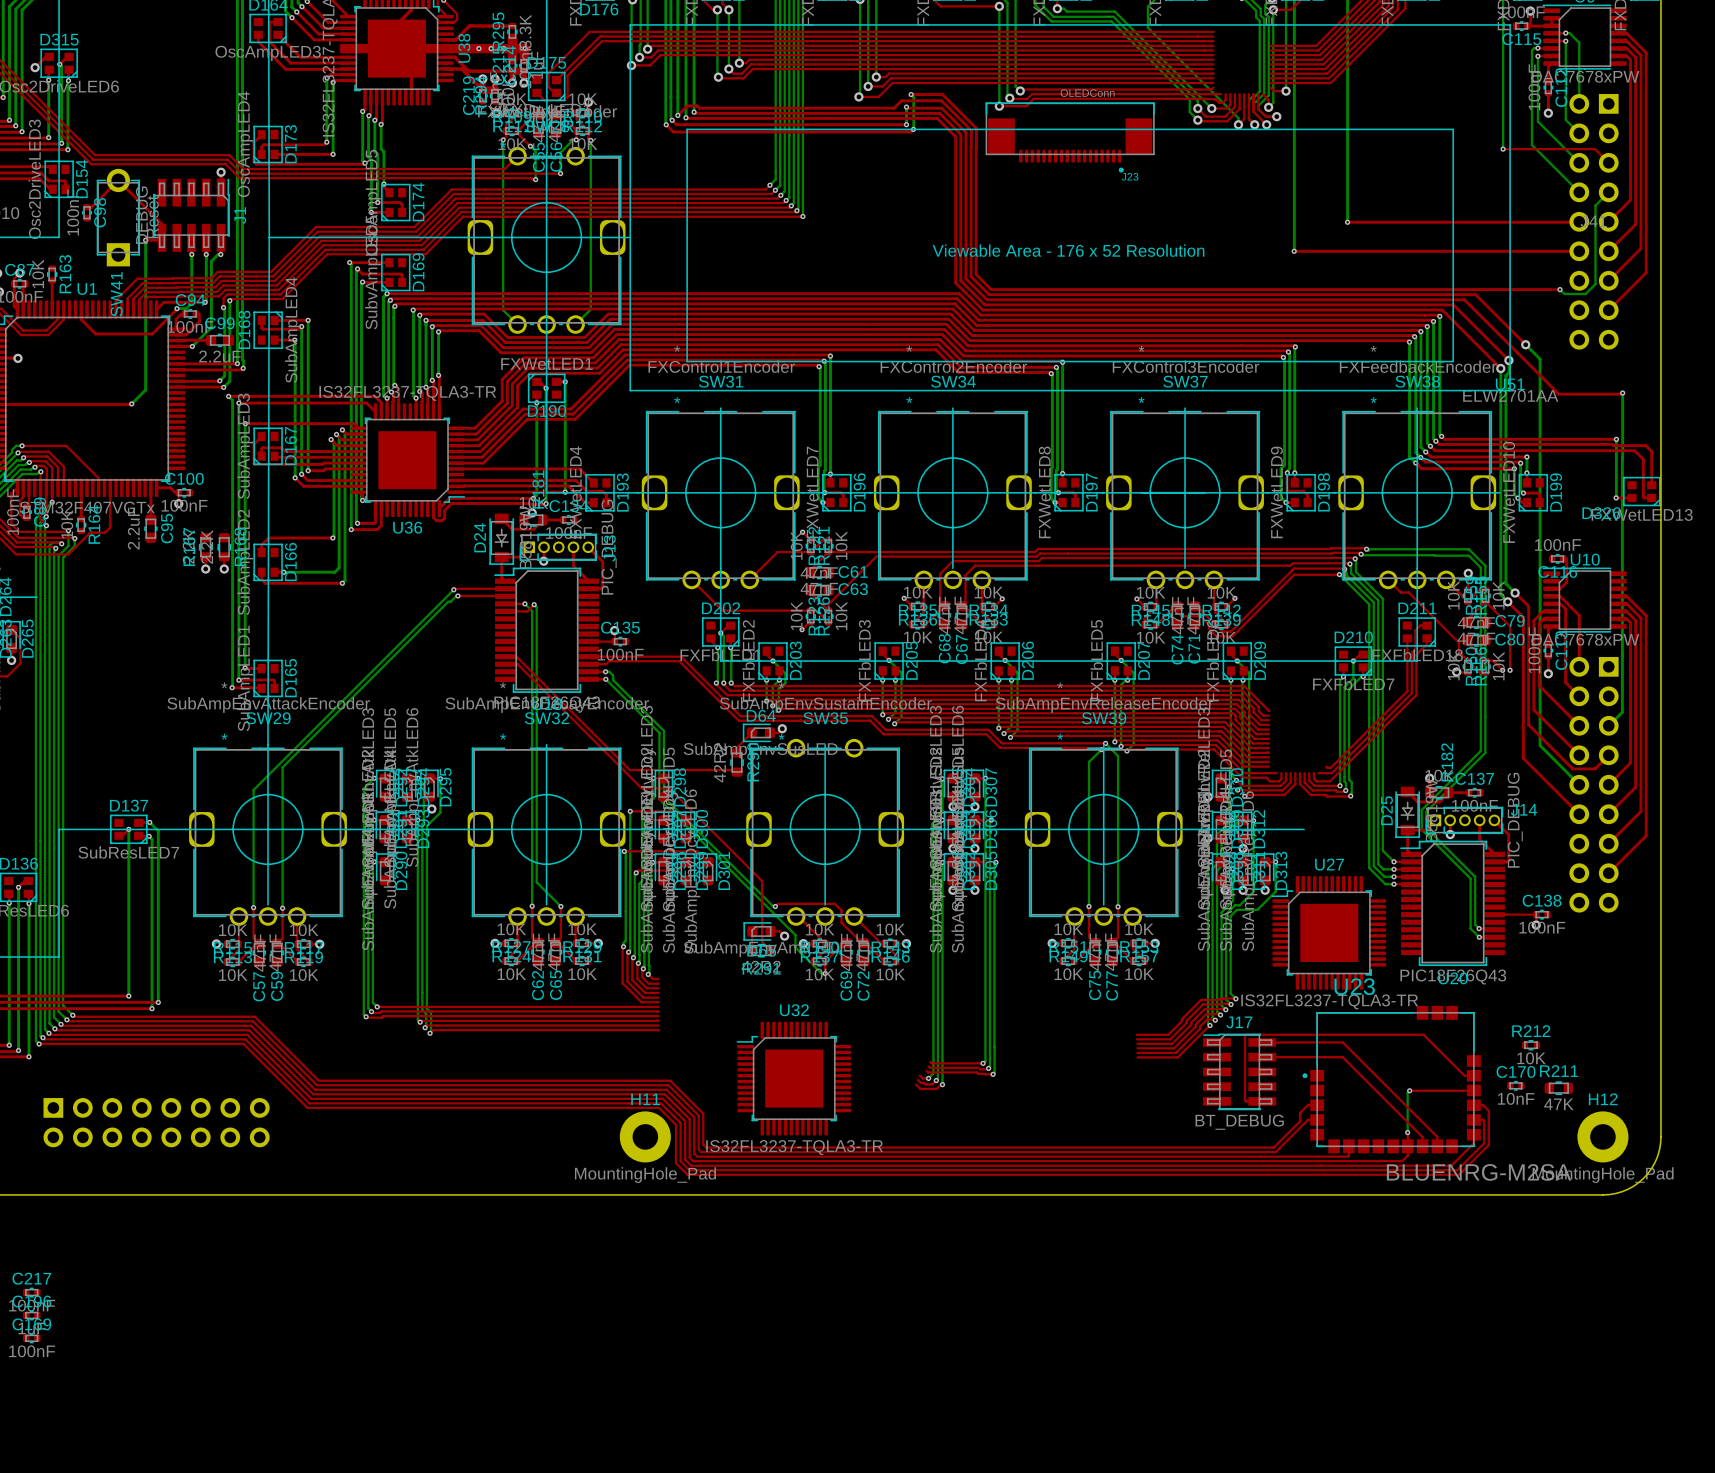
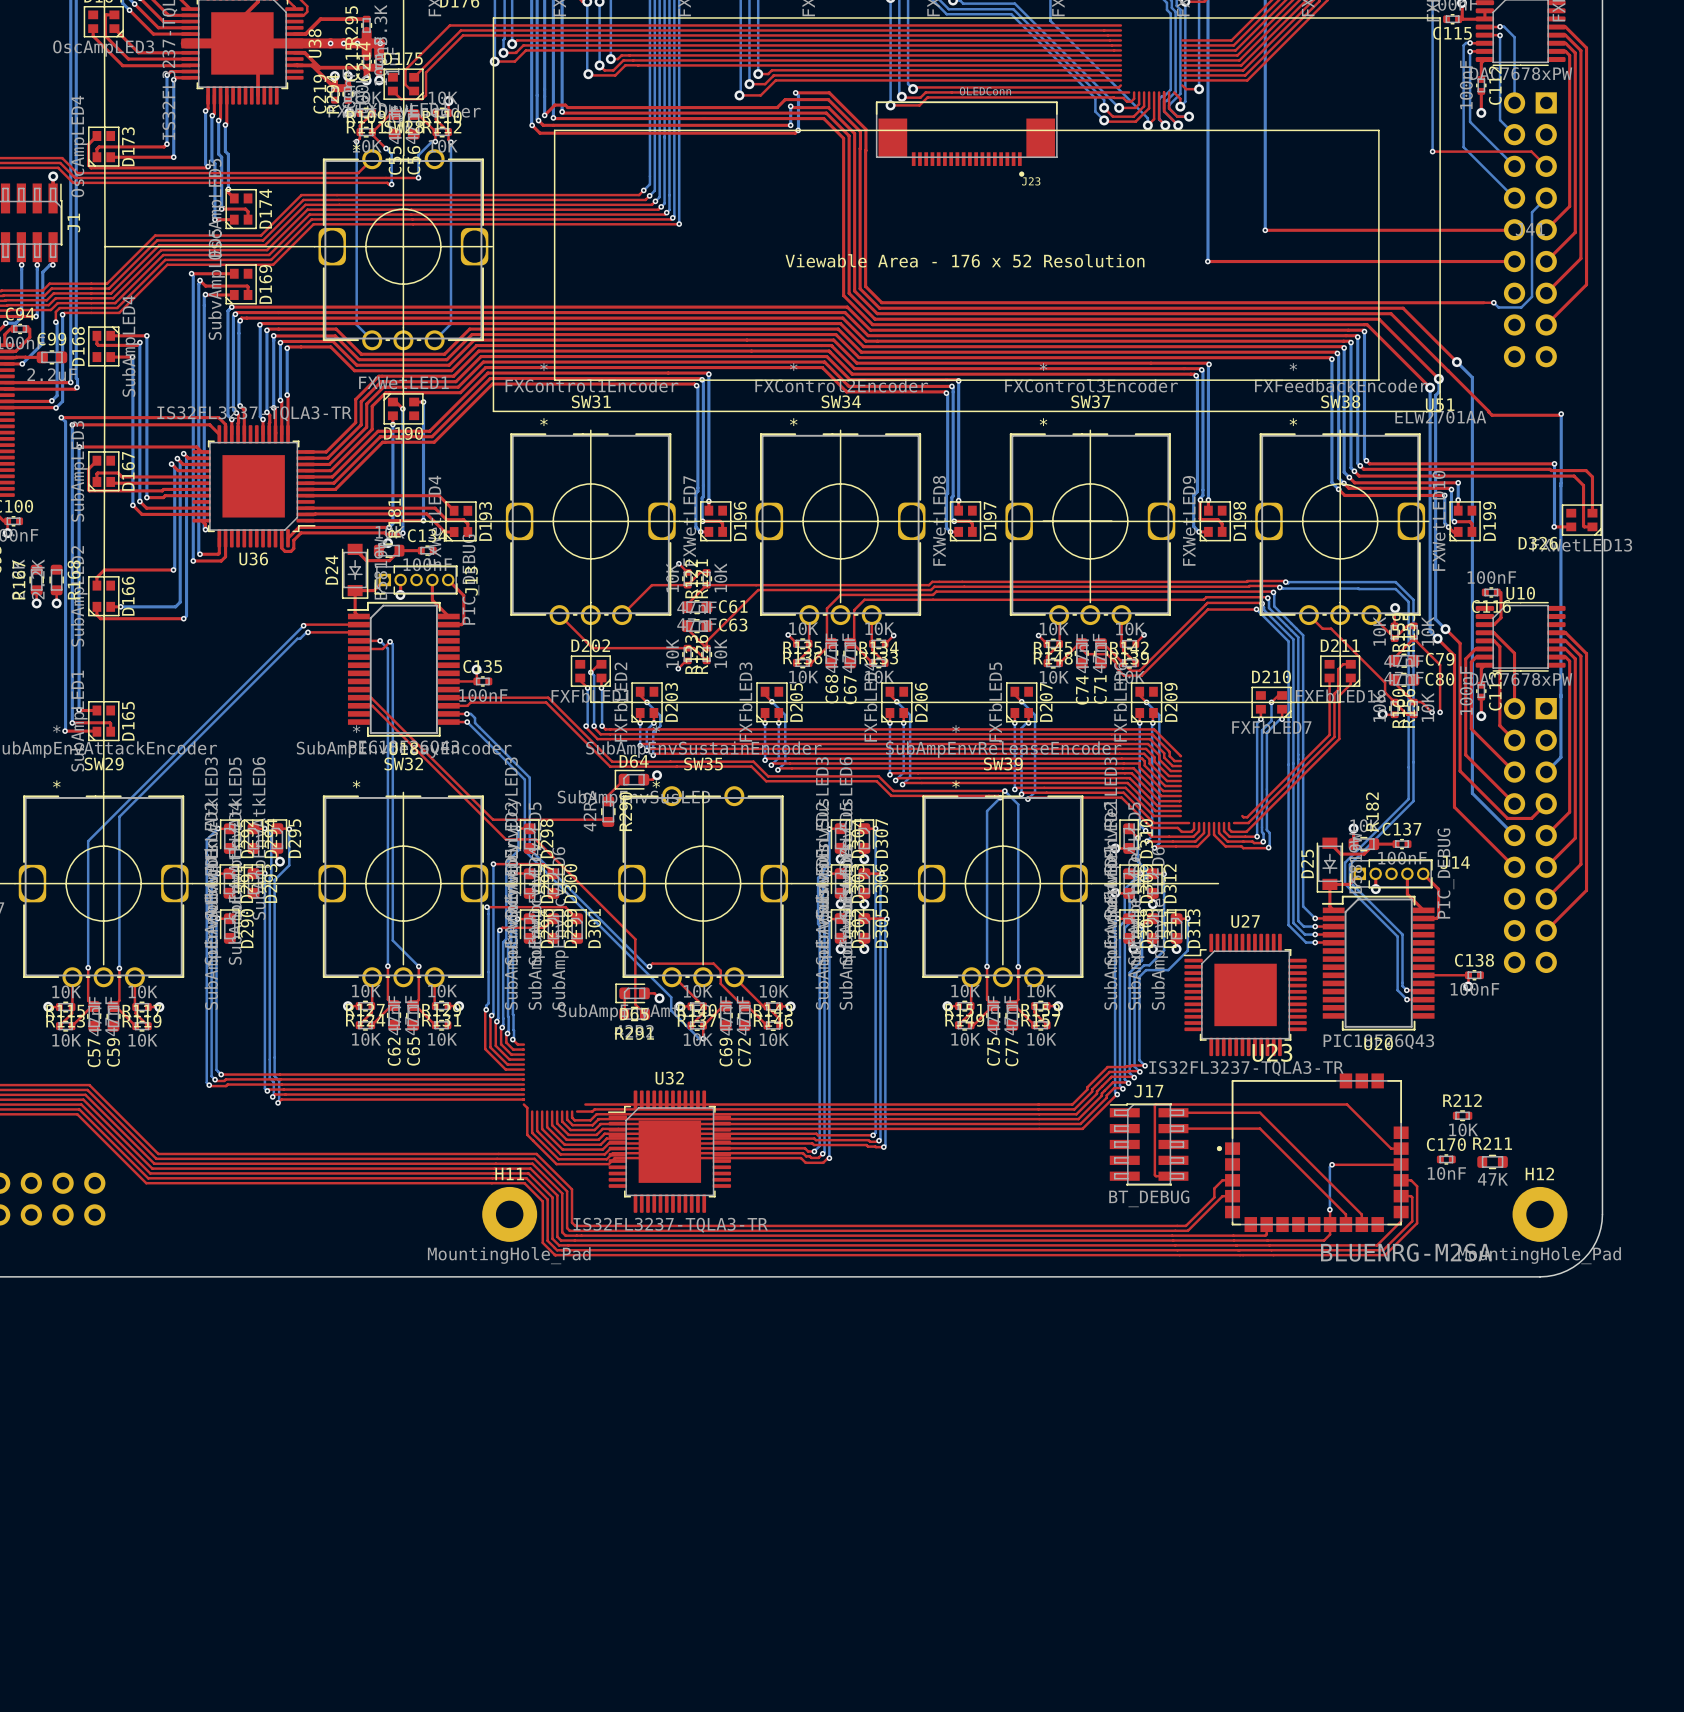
top track: none -> (523, 1104) (527, 1107) (527, 1134) (556, 1164) (608, 1164) (614, 1158) (801, 1158)
top track: none -> (585, 1104) (1038, 1104)
top track: none -> (1038, 1109) (594, 1109) (592, 1111) (577, 1111)
top track: none -> (532, 1111) (532, 1132) (558, 1159) (606, 1159) (612, 1153) (803, 1153)
top track: none -> (537, 1111) (537, 1130) (560, 1154) (604, 1154) (610, 1148) (805, 1148)
top track: none -> (542, 1111) (542, 1129) (562, 1149) (602, 1149) (608, 1143) (812, 1143)
top track: none -> (547, 1111) (547, 1127) (564, 1144) (600, 1144) (606, 1138) (814, 1138)
top track: none -> (552, 1111) (552, 1125) (566, 1139) (598, 1139) (604, 1133) (816, 1133)
top track: none -> (557, 1111) (557, 1123) (568, 1134) (596, 1134) (602, 1128) (1039, 1128)
top track: none -> (562, 1111) (562, 1121) (570, 1130) (594, 1130) (600, 1124) (1039, 1124)
top track: none -> (567, 1111) (567, 1119) (572, 1125) (592, 1125) (598, 1119) (1039, 1119)
top track: none -> (572, 1111) (572, 1117) (574, 1120) (590, 1120) (596, 1114) (1039, 1114)

